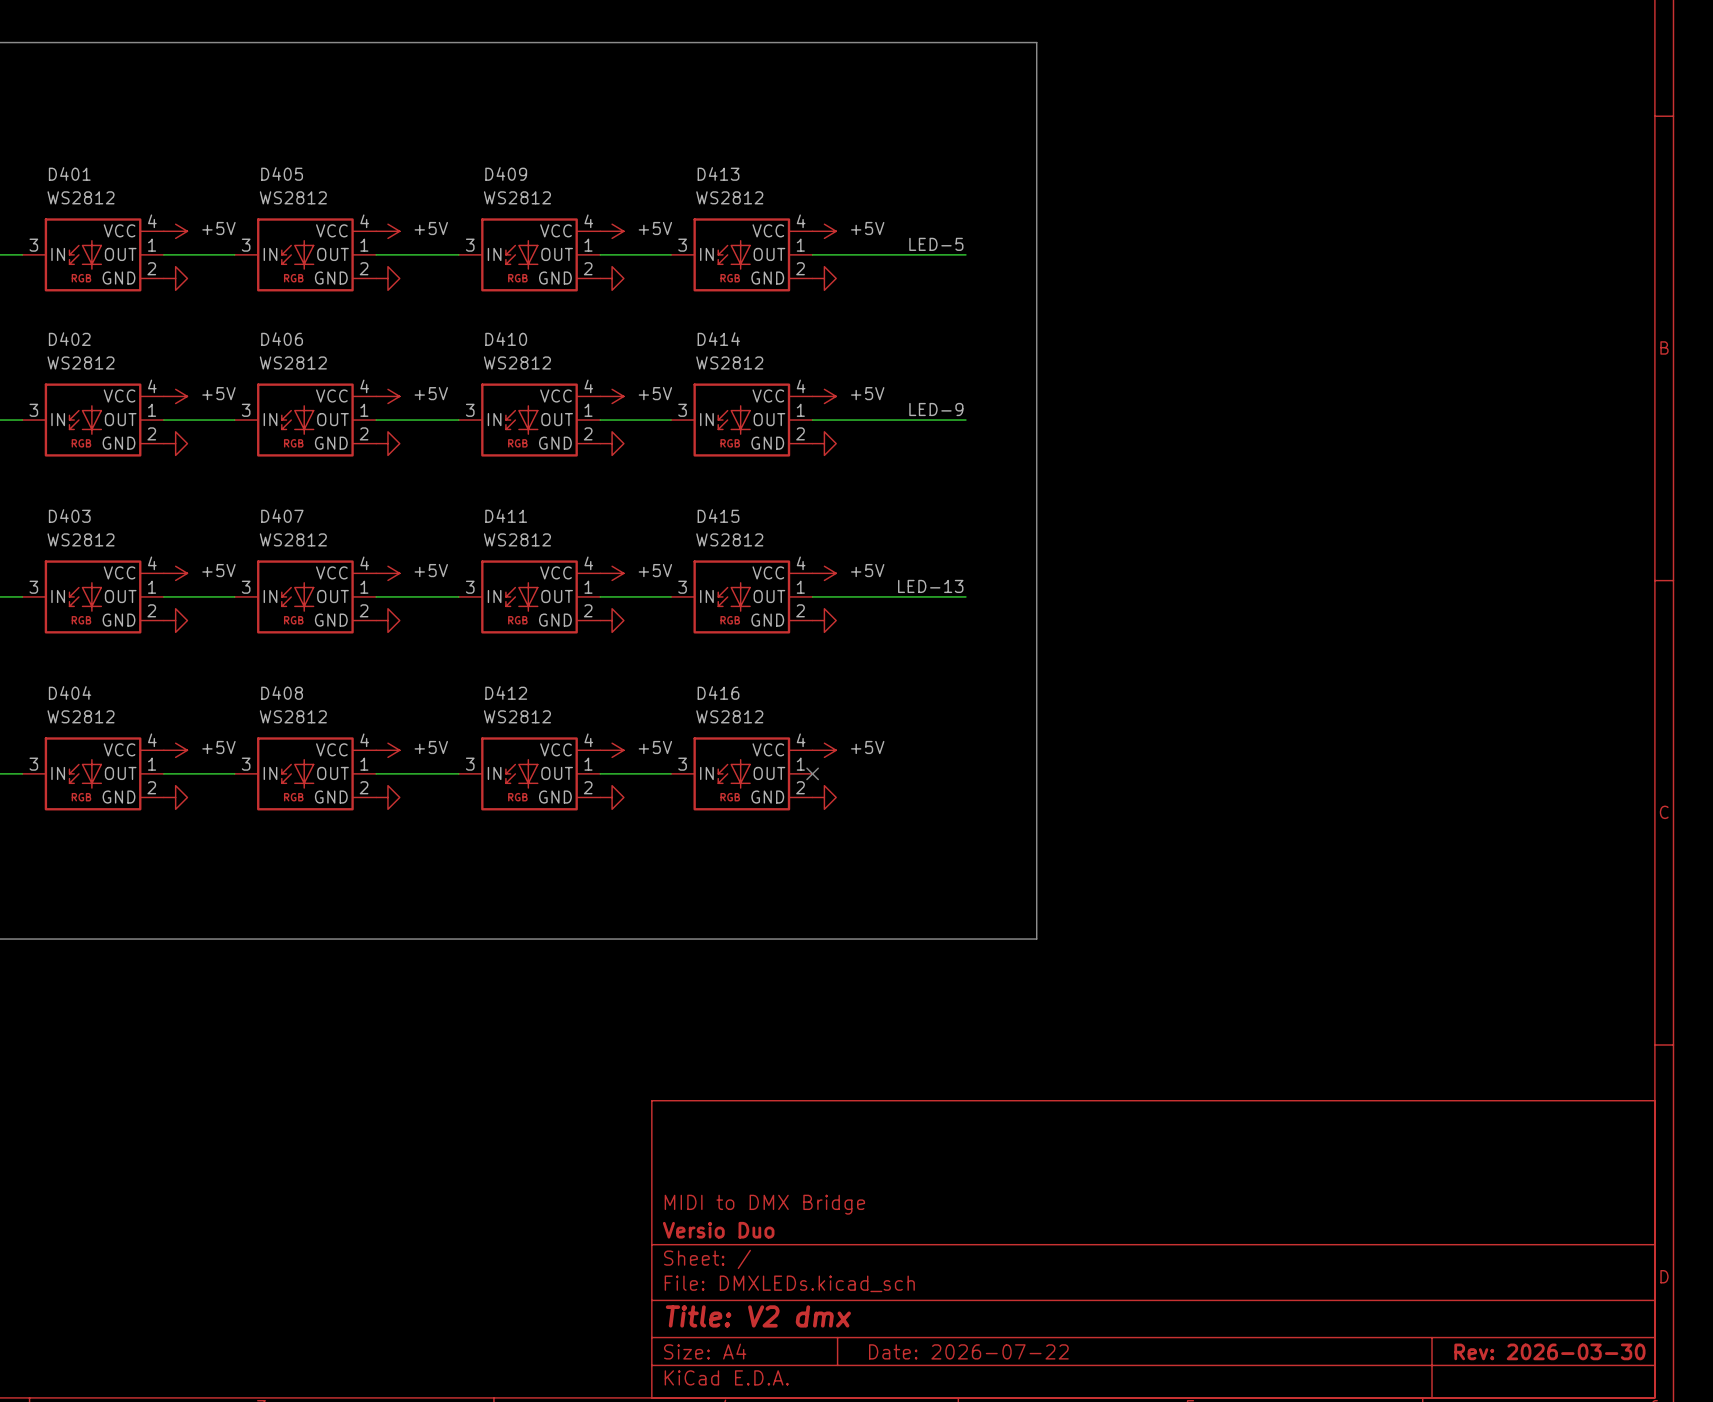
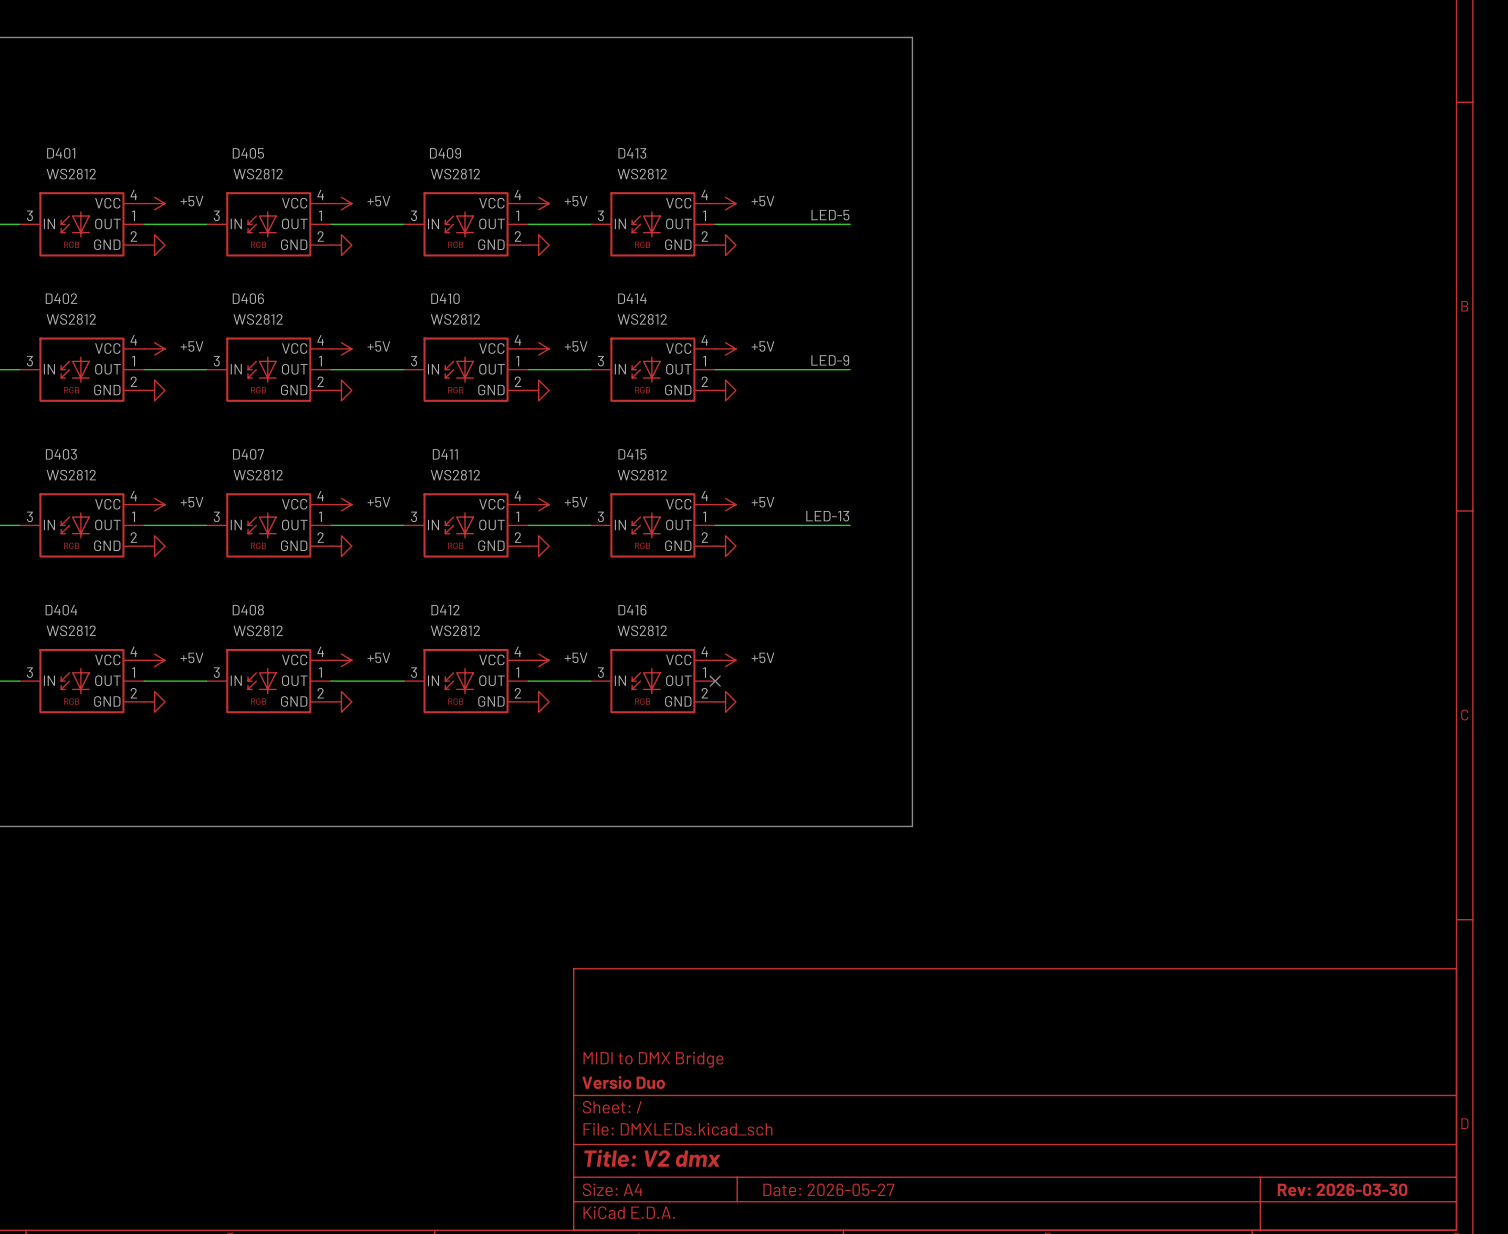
title block: Date: 2026-07-22 (968, 1351) -> Date: 2026-05-27 (828, 1189)

